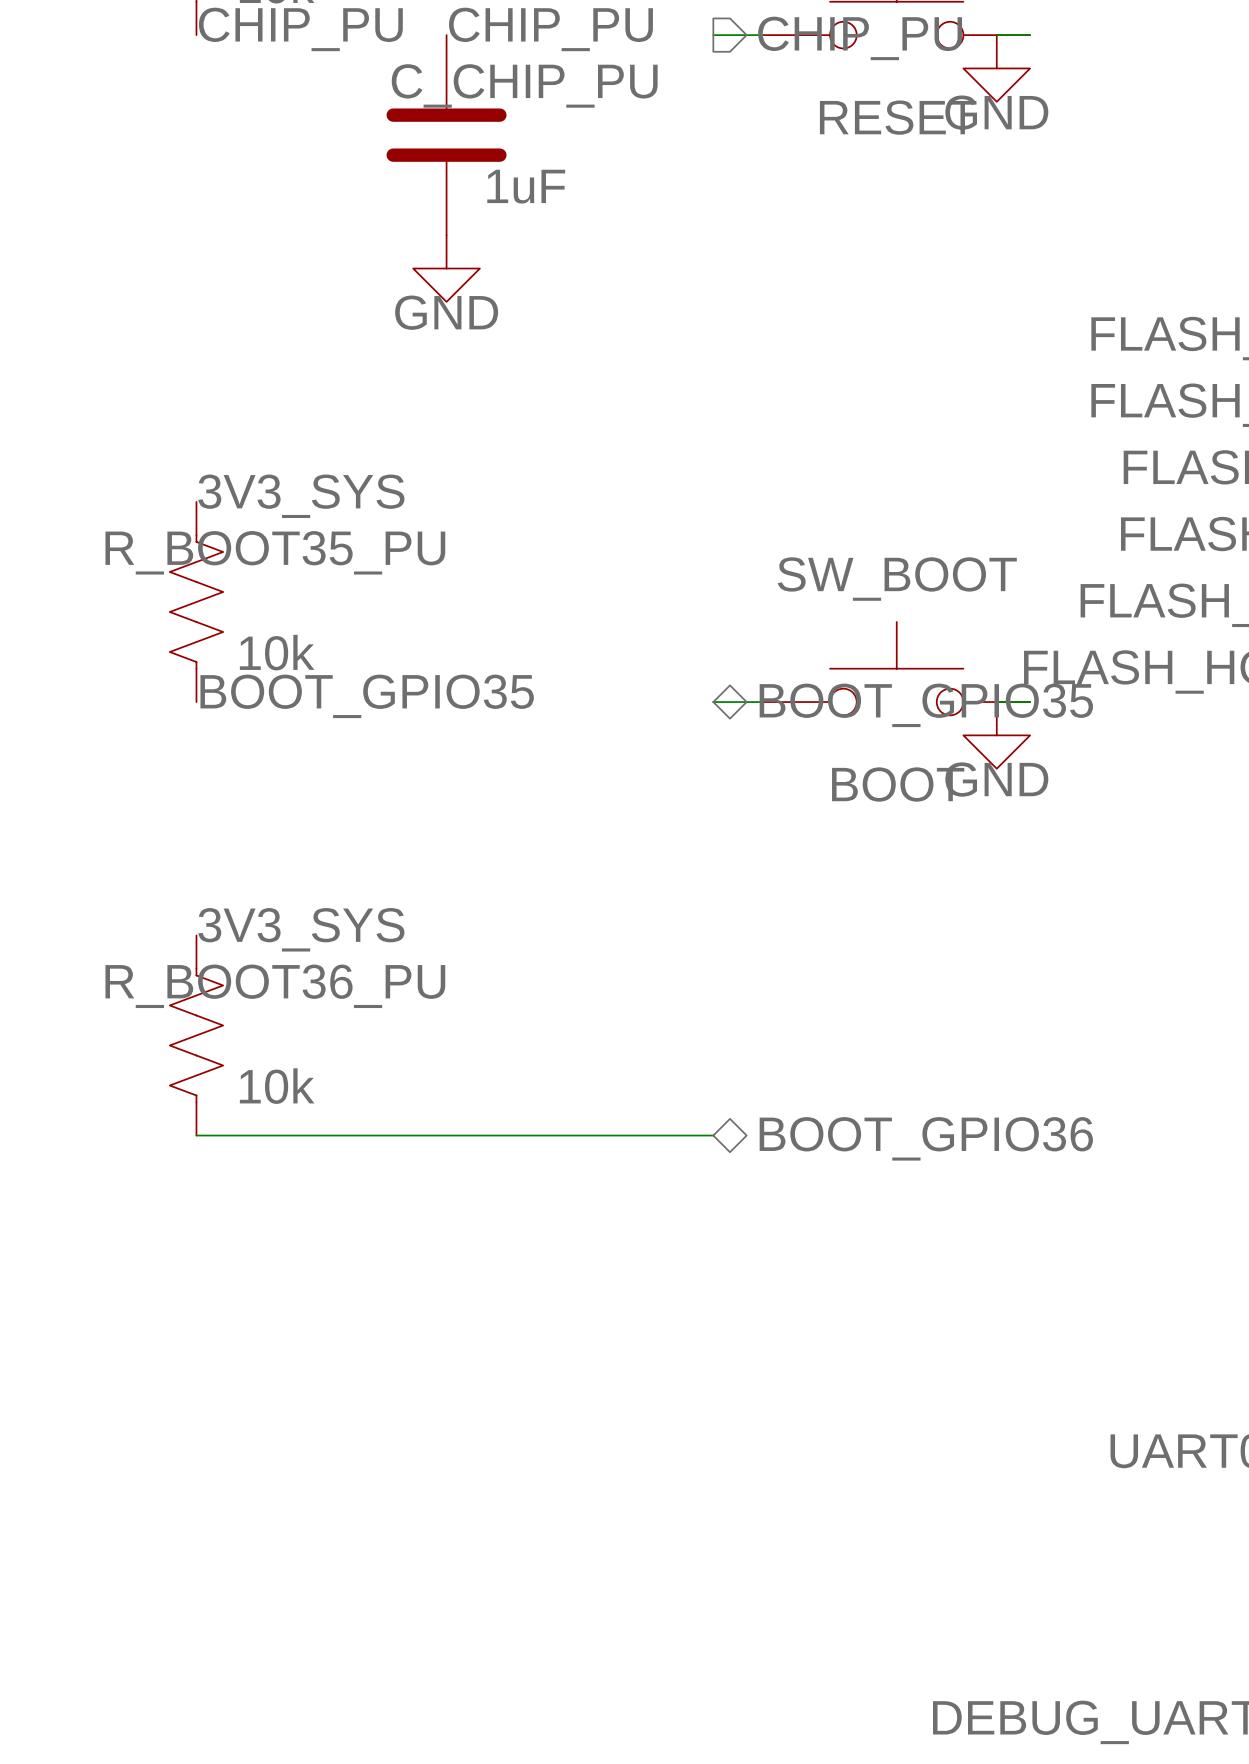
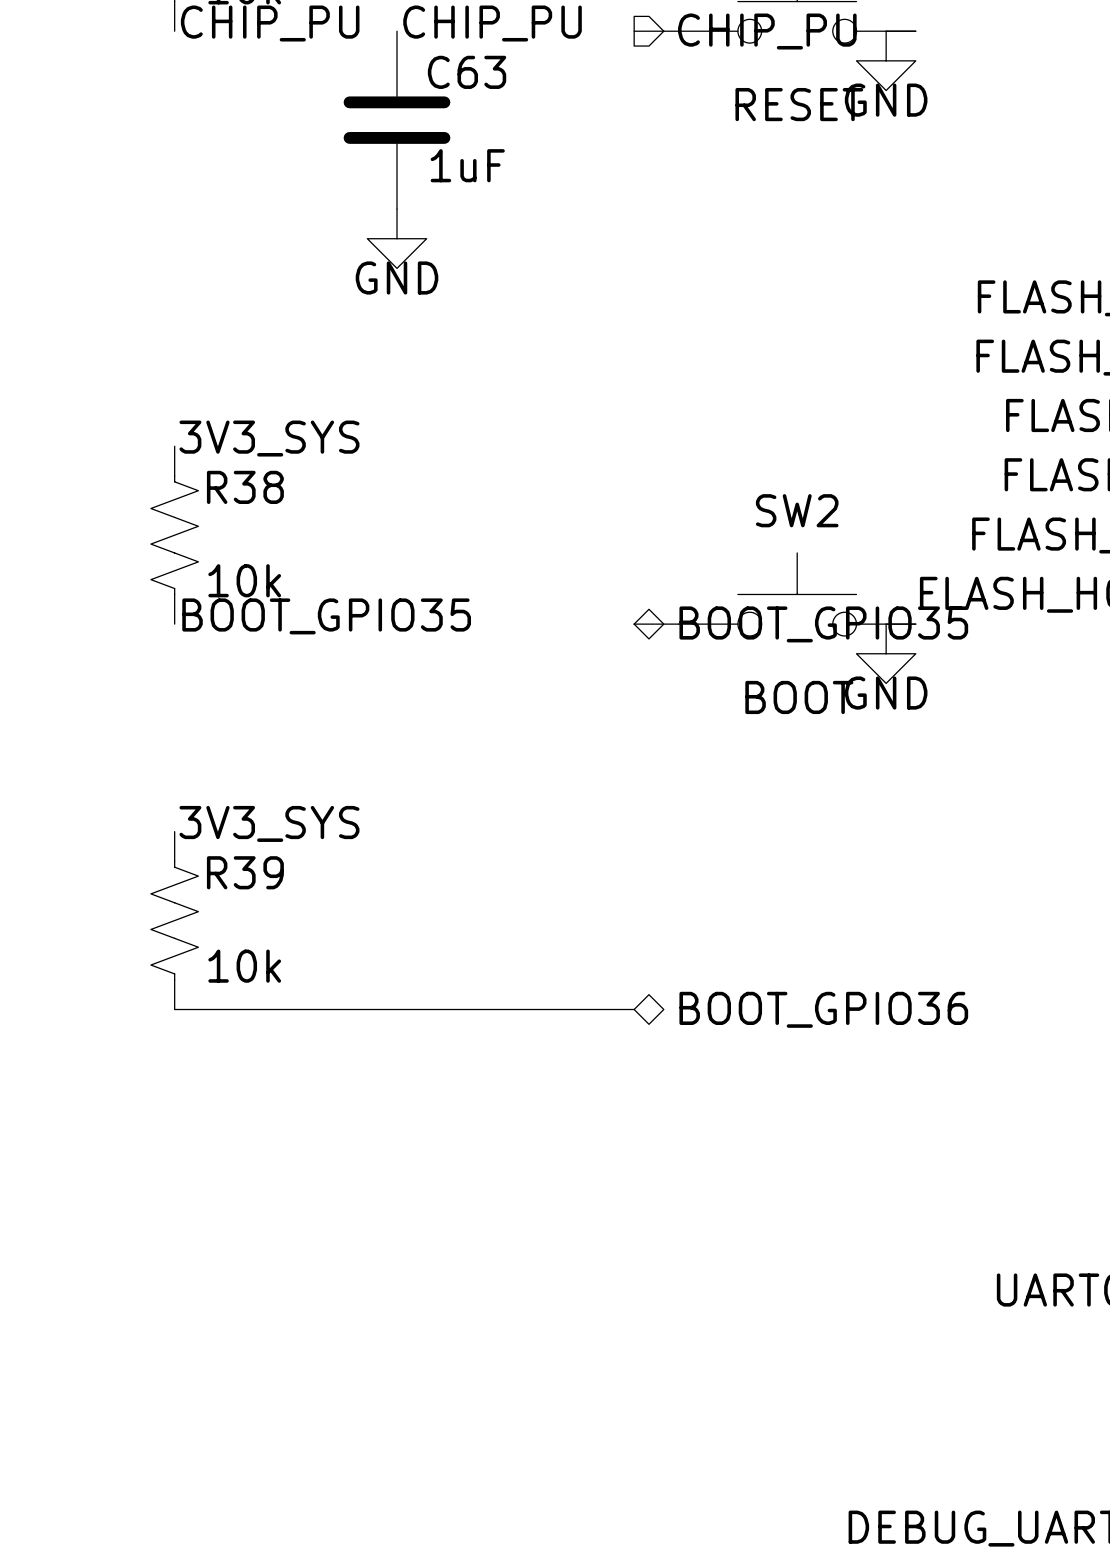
C_CHIP_PU name: C_CHIP_PU (524, 85) -> C63 (467, 72)
R_BOOT35_PU name: R_BOOT35_PU (275, 552) -> R38 (245, 487)
SW_BOOT name: SW_BOOT (897, 579) -> SW2 (797, 510)
R_BOOT36_PU name: R_BOOT36_PU (275, 986) -> R39 (245, 872)

